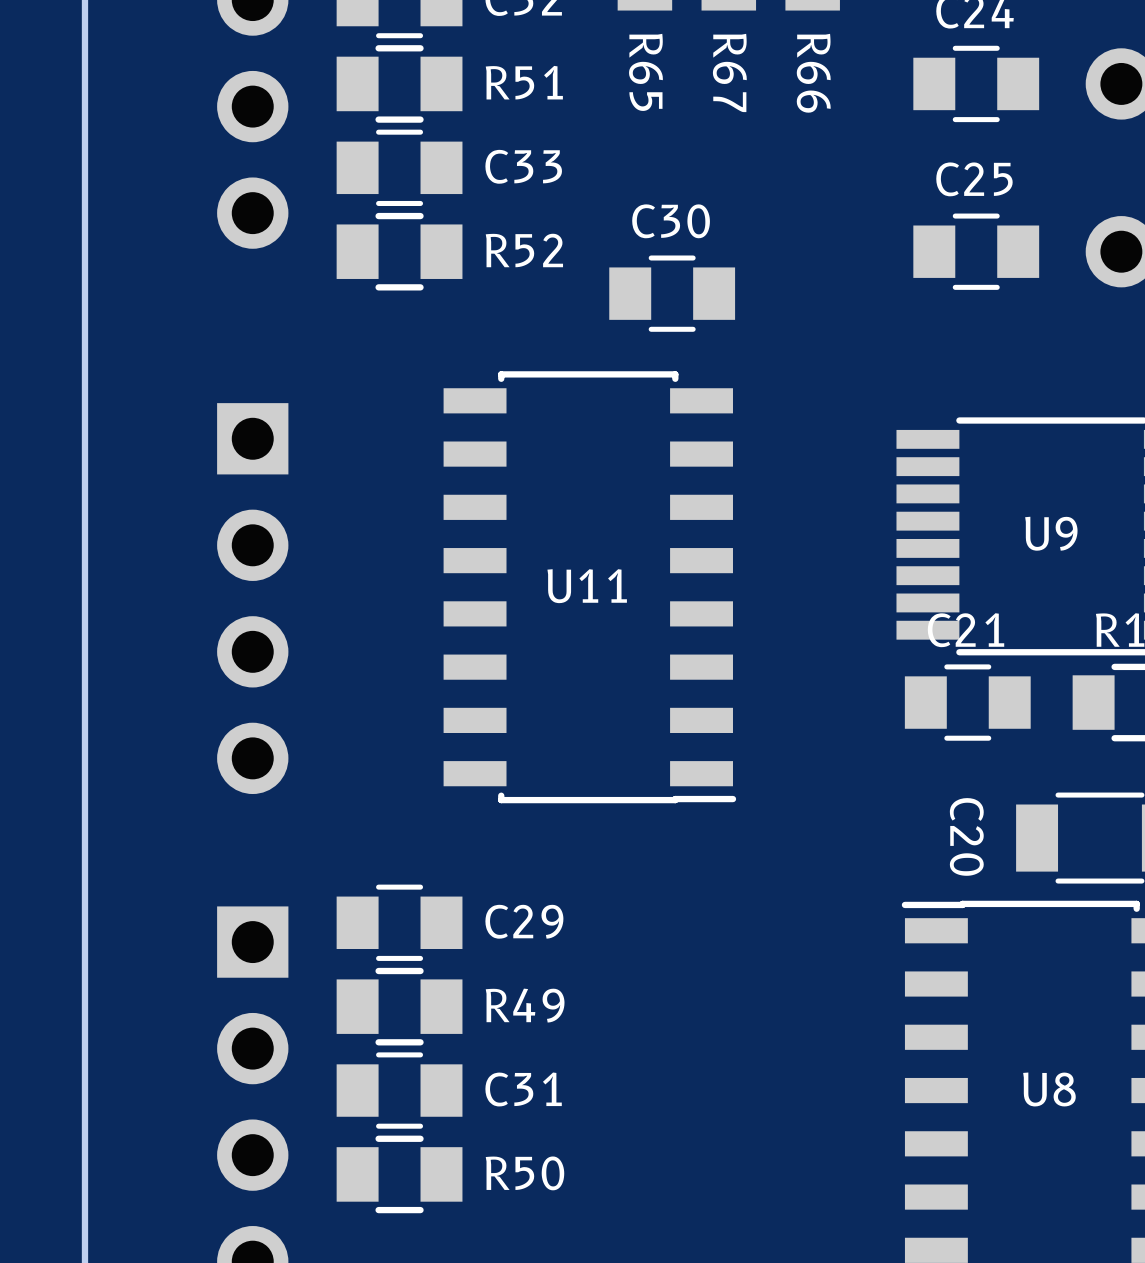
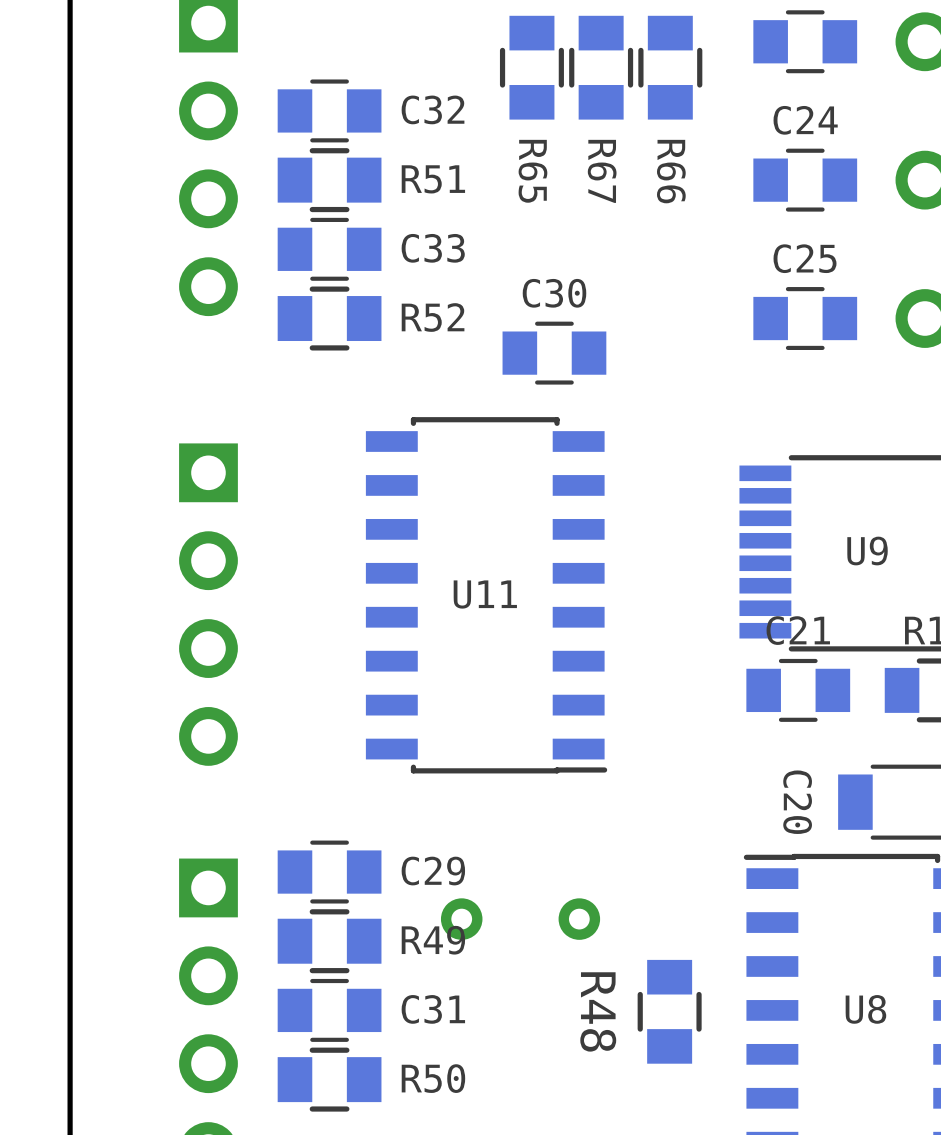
part: none -> (520, 919)
R48: none -> (669, 1011)

